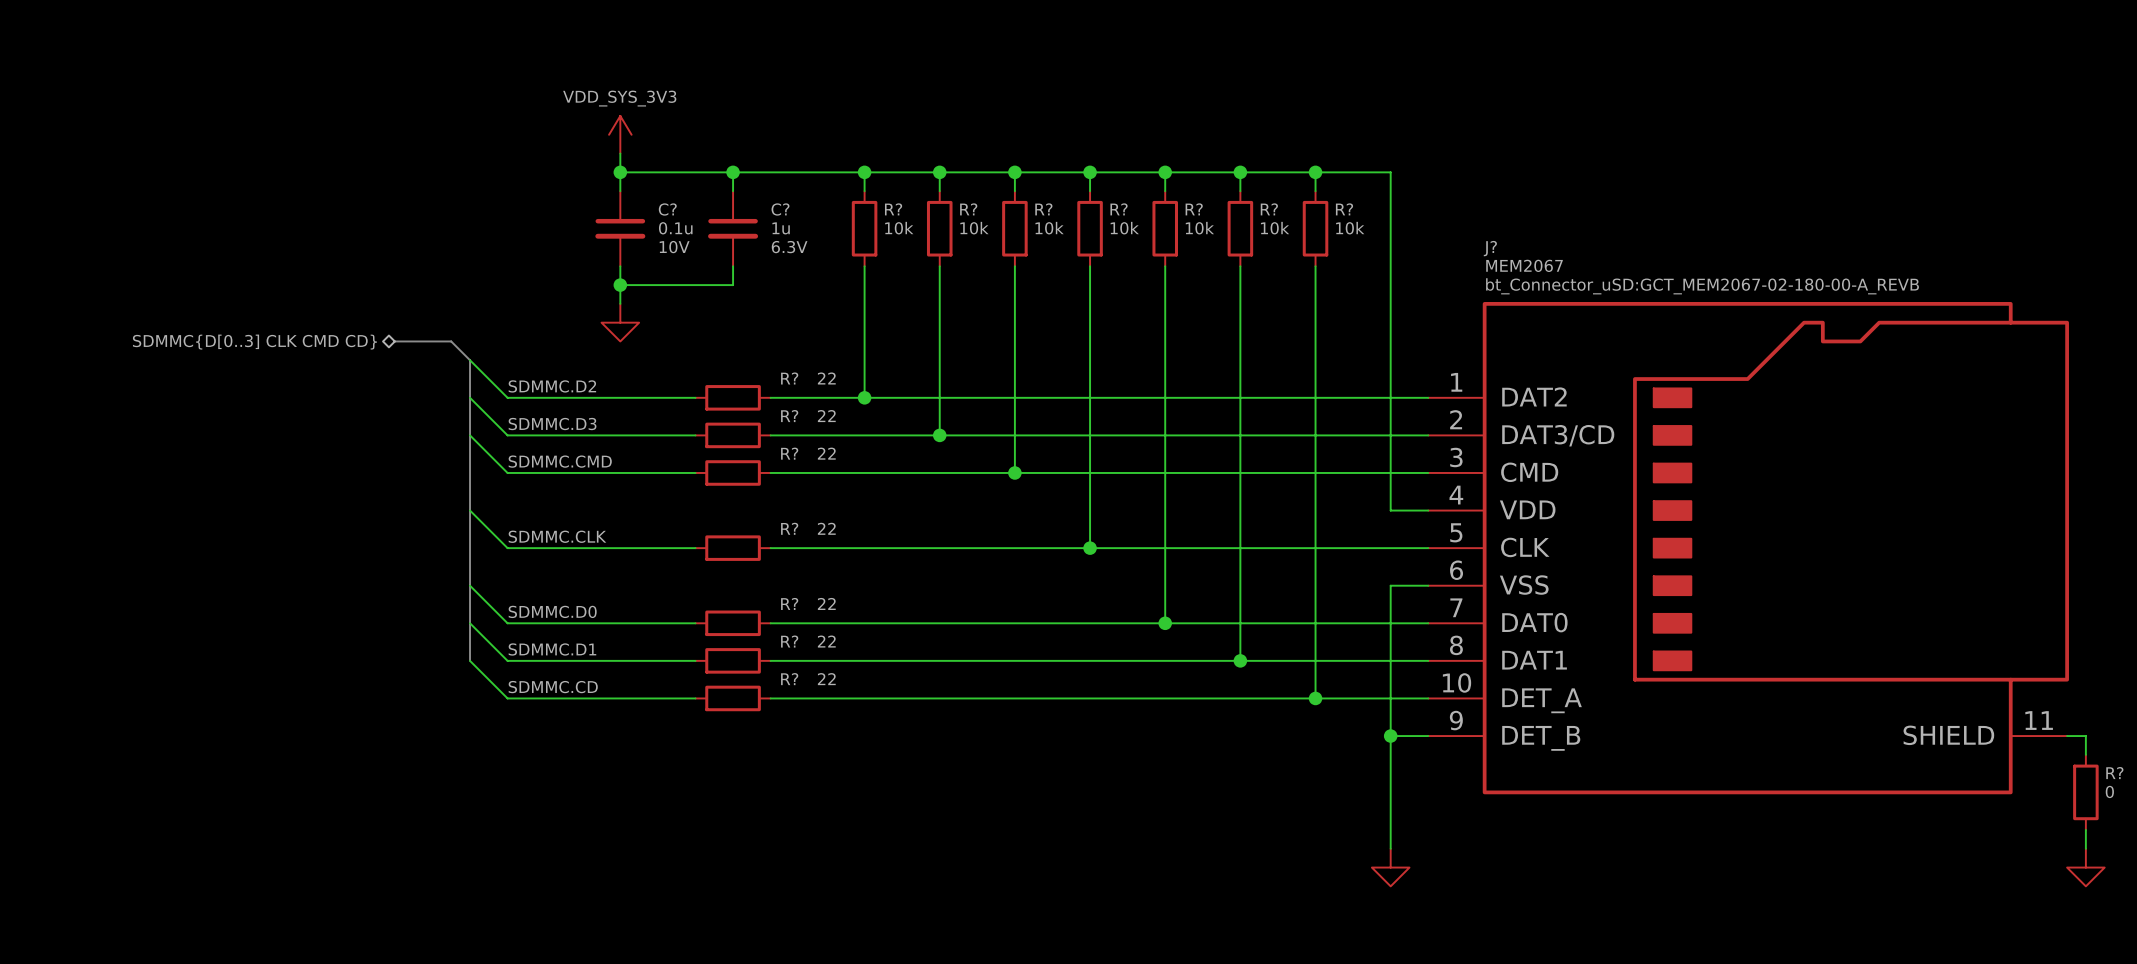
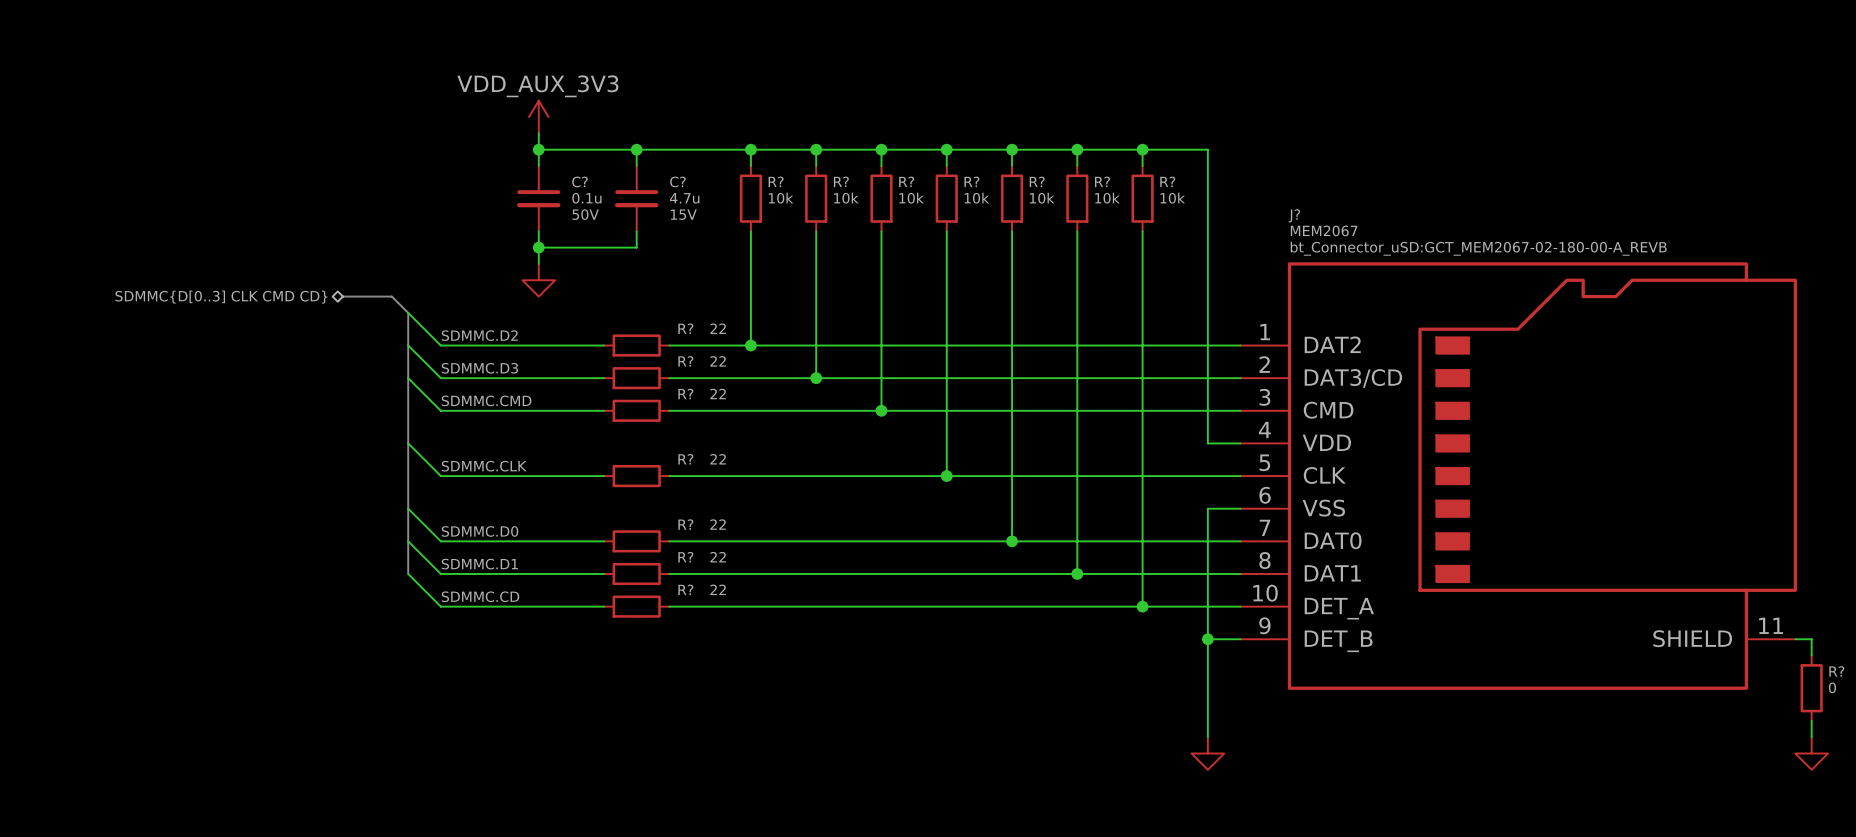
power symbol: VDD_SYS_3V3 (620, 134) -> VDD_AUX_3V3 (538, 117)
C? value: 1u (781, 228) -> 4.7u (684, 198)
C? text: 10V (674, 247) -> 50V (585, 214)
C? text: 6.3V (789, 247) -> 15V (683, 214)

